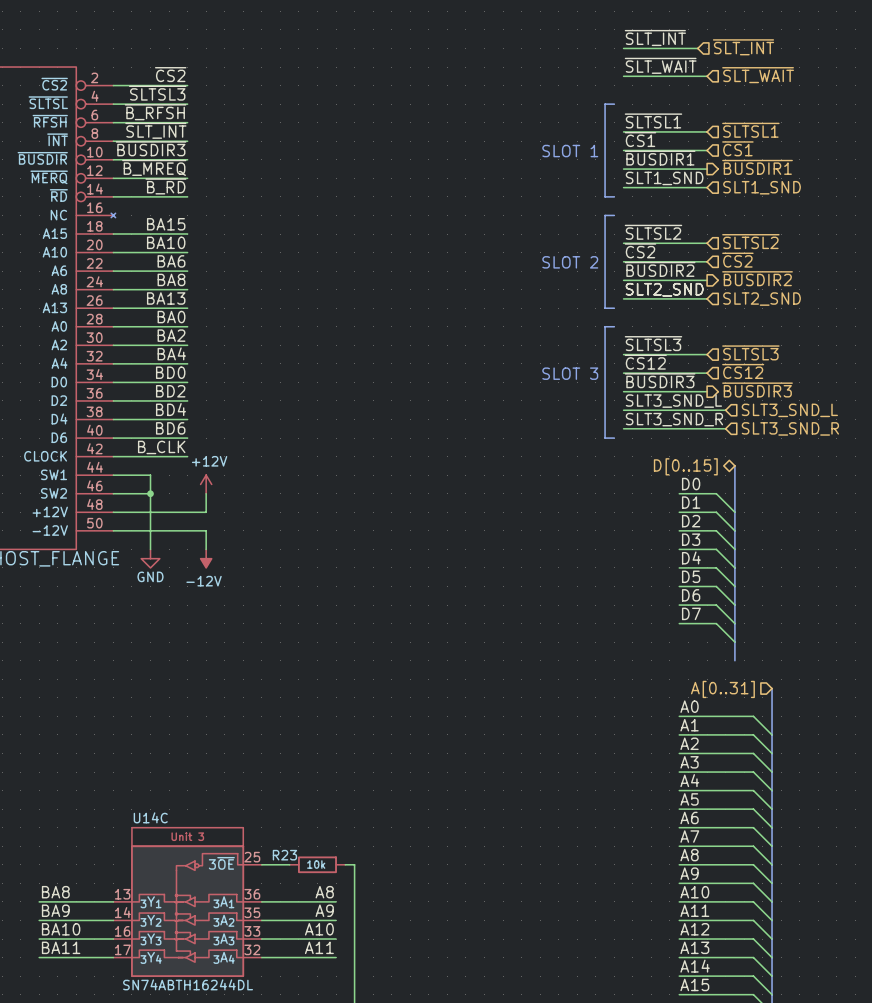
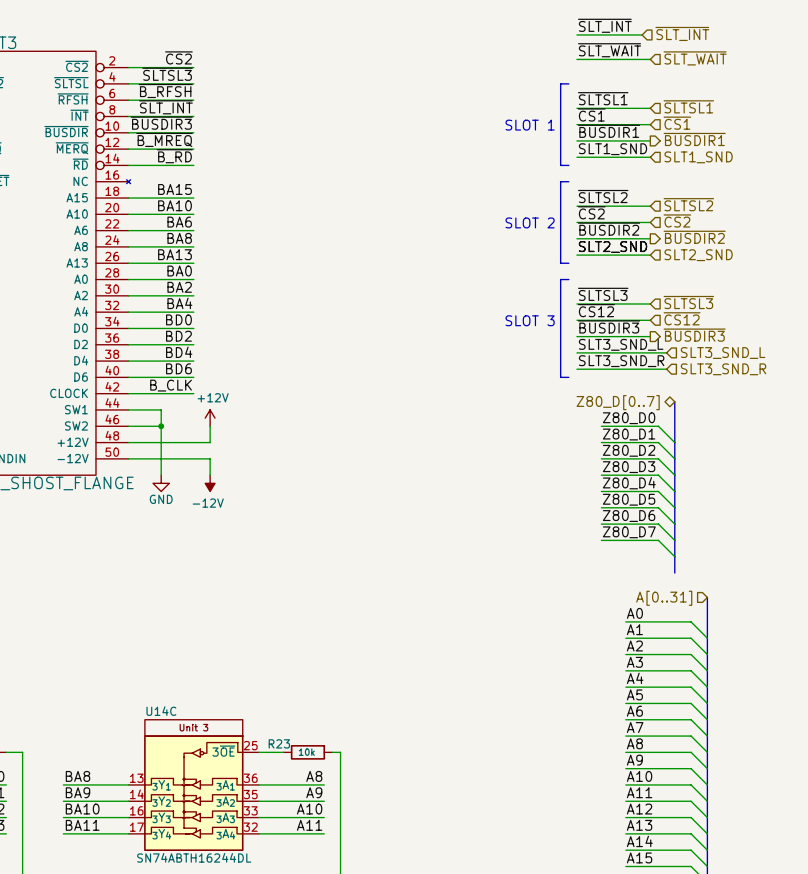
hierarchical label: D[0..15] (685, 466) -> Z80_D[0..7] (618, 402)
label: none -> Z80_D0 (629, 418)
label: D0 (691, 484) -> none
wire: none -> (601, 426) (625, 426)
label: D1 (691, 502) -> none
label: none -> Z80_D1 (629, 434)
wire: none -> (601, 442) (625, 442)
label: none -> Z80_D2 (629, 450)
label: D2 (691, 521) -> none
wire: none -> (601, 458) (625, 458)
label: D3 (691, 539) -> none
label: none -> Z80_D3 (629, 467)
wire: none -> (601, 475) (625, 475)
label: D4 (691, 557) -> none
label: none -> Z80_D4 (629, 483)
wire: none -> (601, 491) (625, 491)
label: D5 (691, 576) -> none
label: none -> Z80_D5 (629, 499)
wire: none -> (601, 507) (625, 507)
label: none -> Z80_D6 (629, 516)
label: D6 (691, 595) -> none
wire: none -> (601, 524) (625, 524)
label: D7 (691, 613) -> none
label: none -> Z80_D7 (629, 532)
wire: none -> (601, 540) (625, 540)

